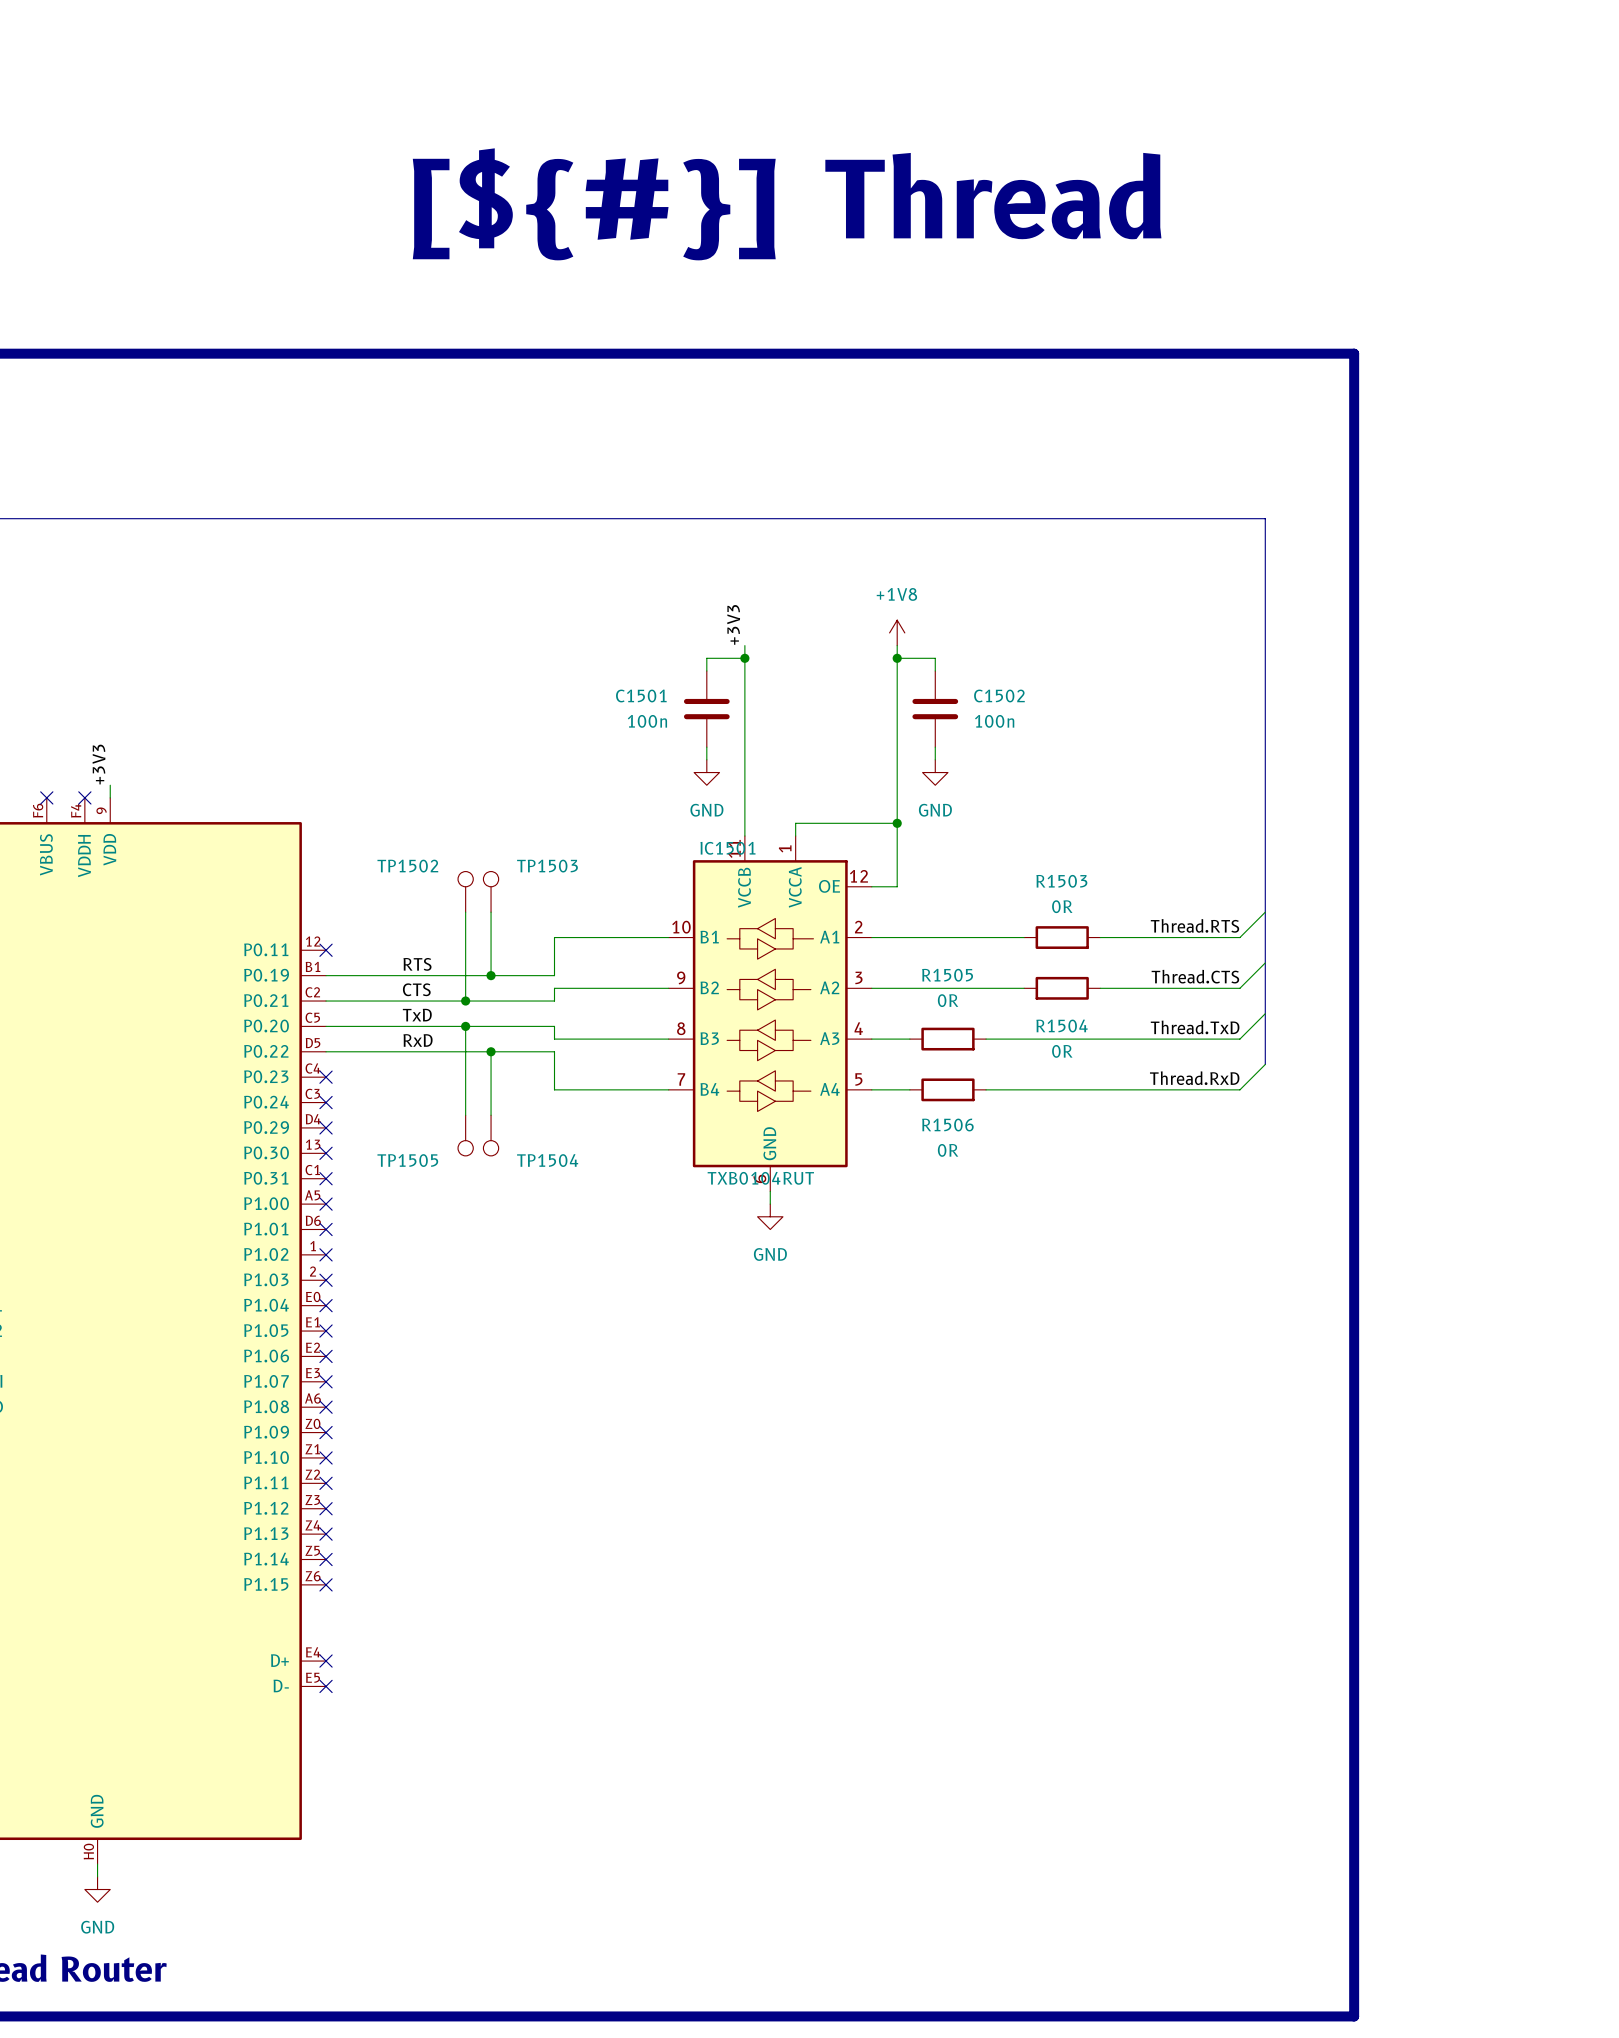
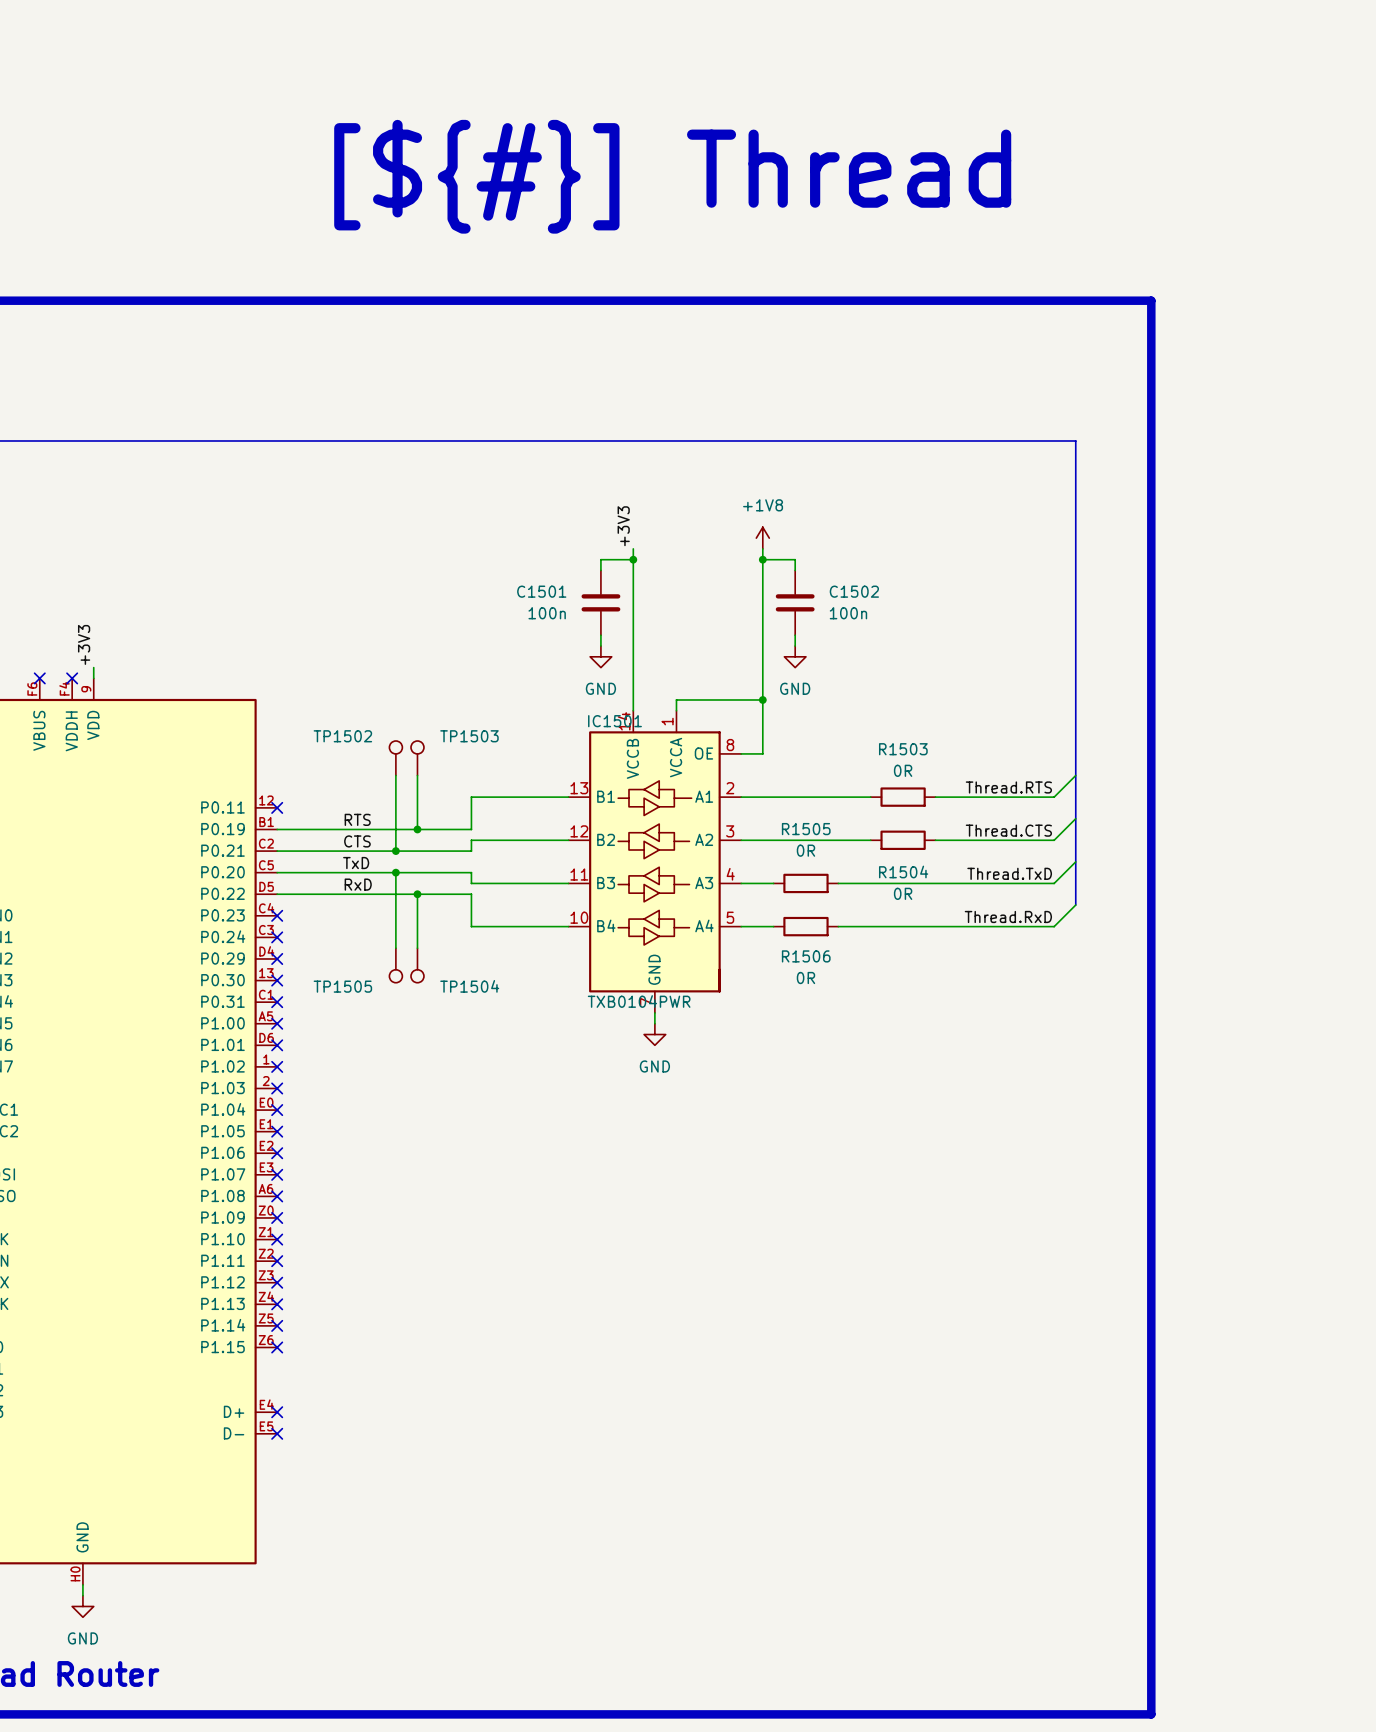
IC1501 symbol: [668, 836, 872, 1192] -> [568, 710, 742, 1013]
IC1501 value: TXB0104RUT (760, 1178) -> TXB0104PWR (639, 1001)

